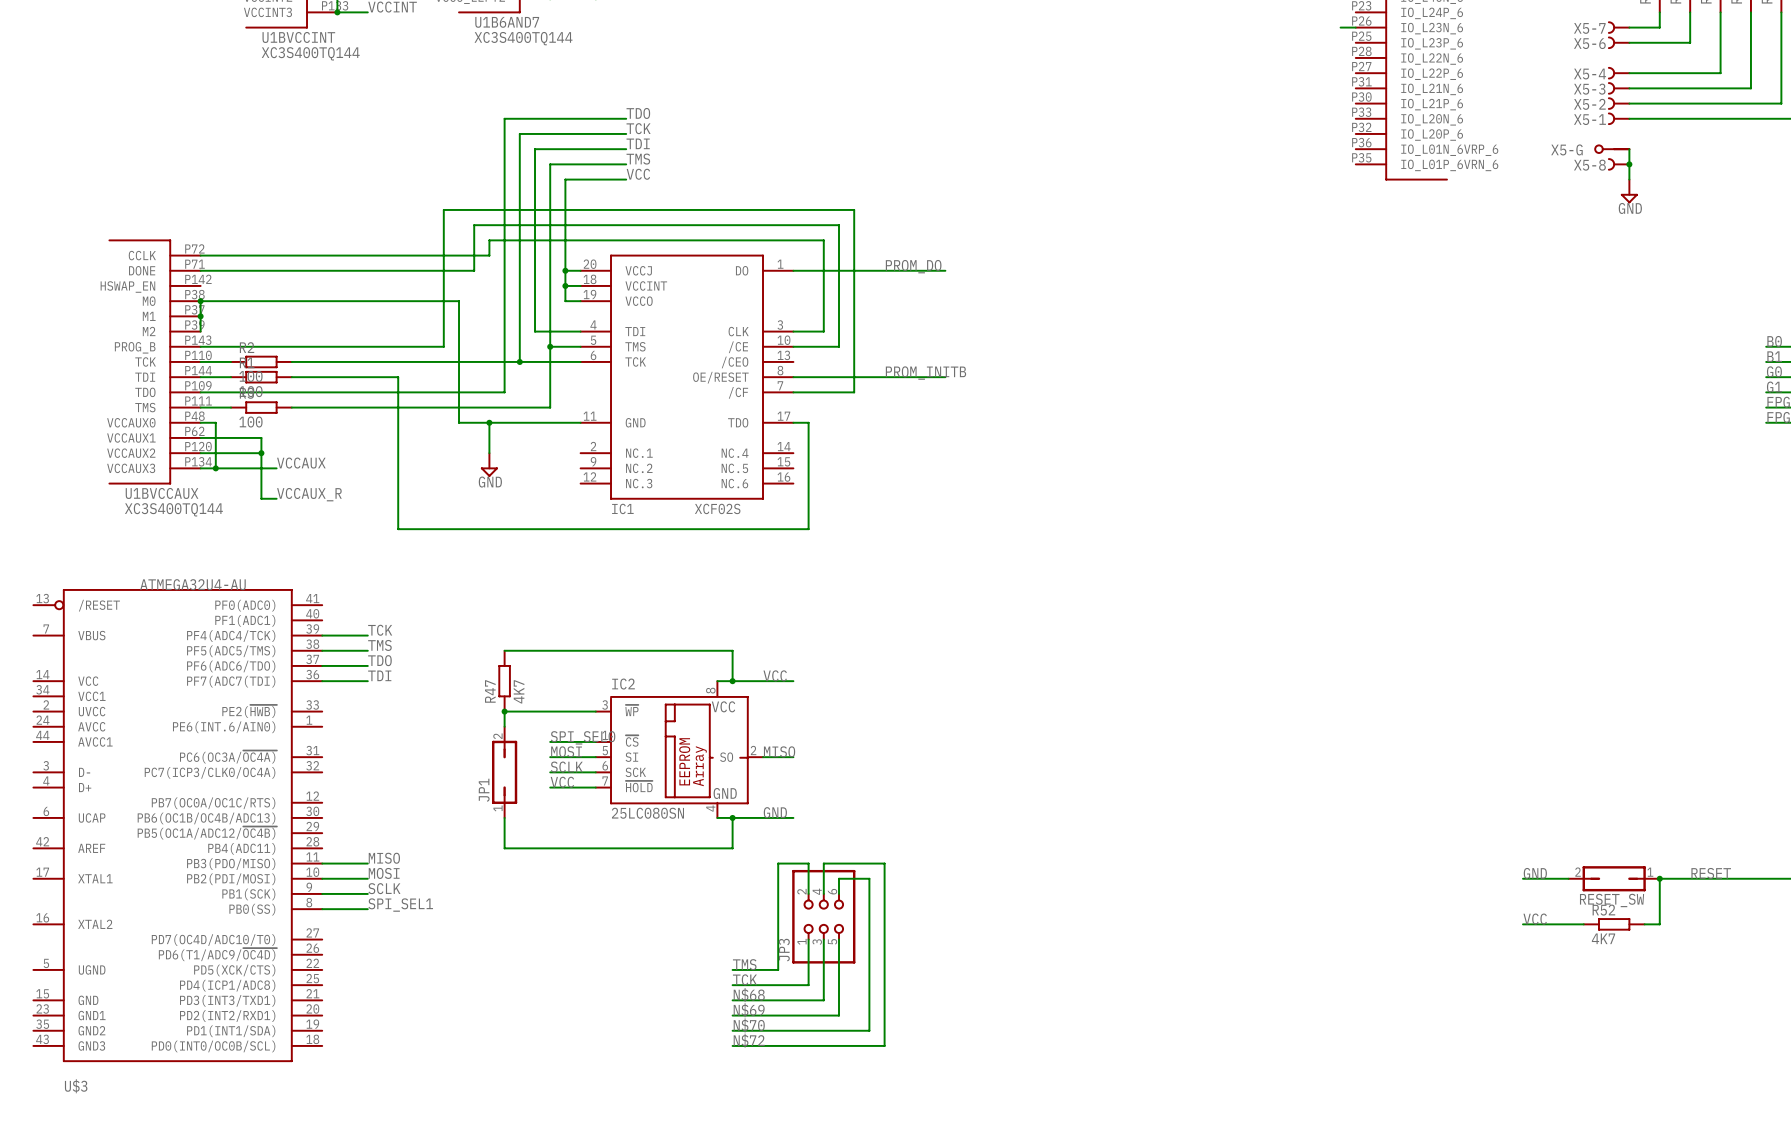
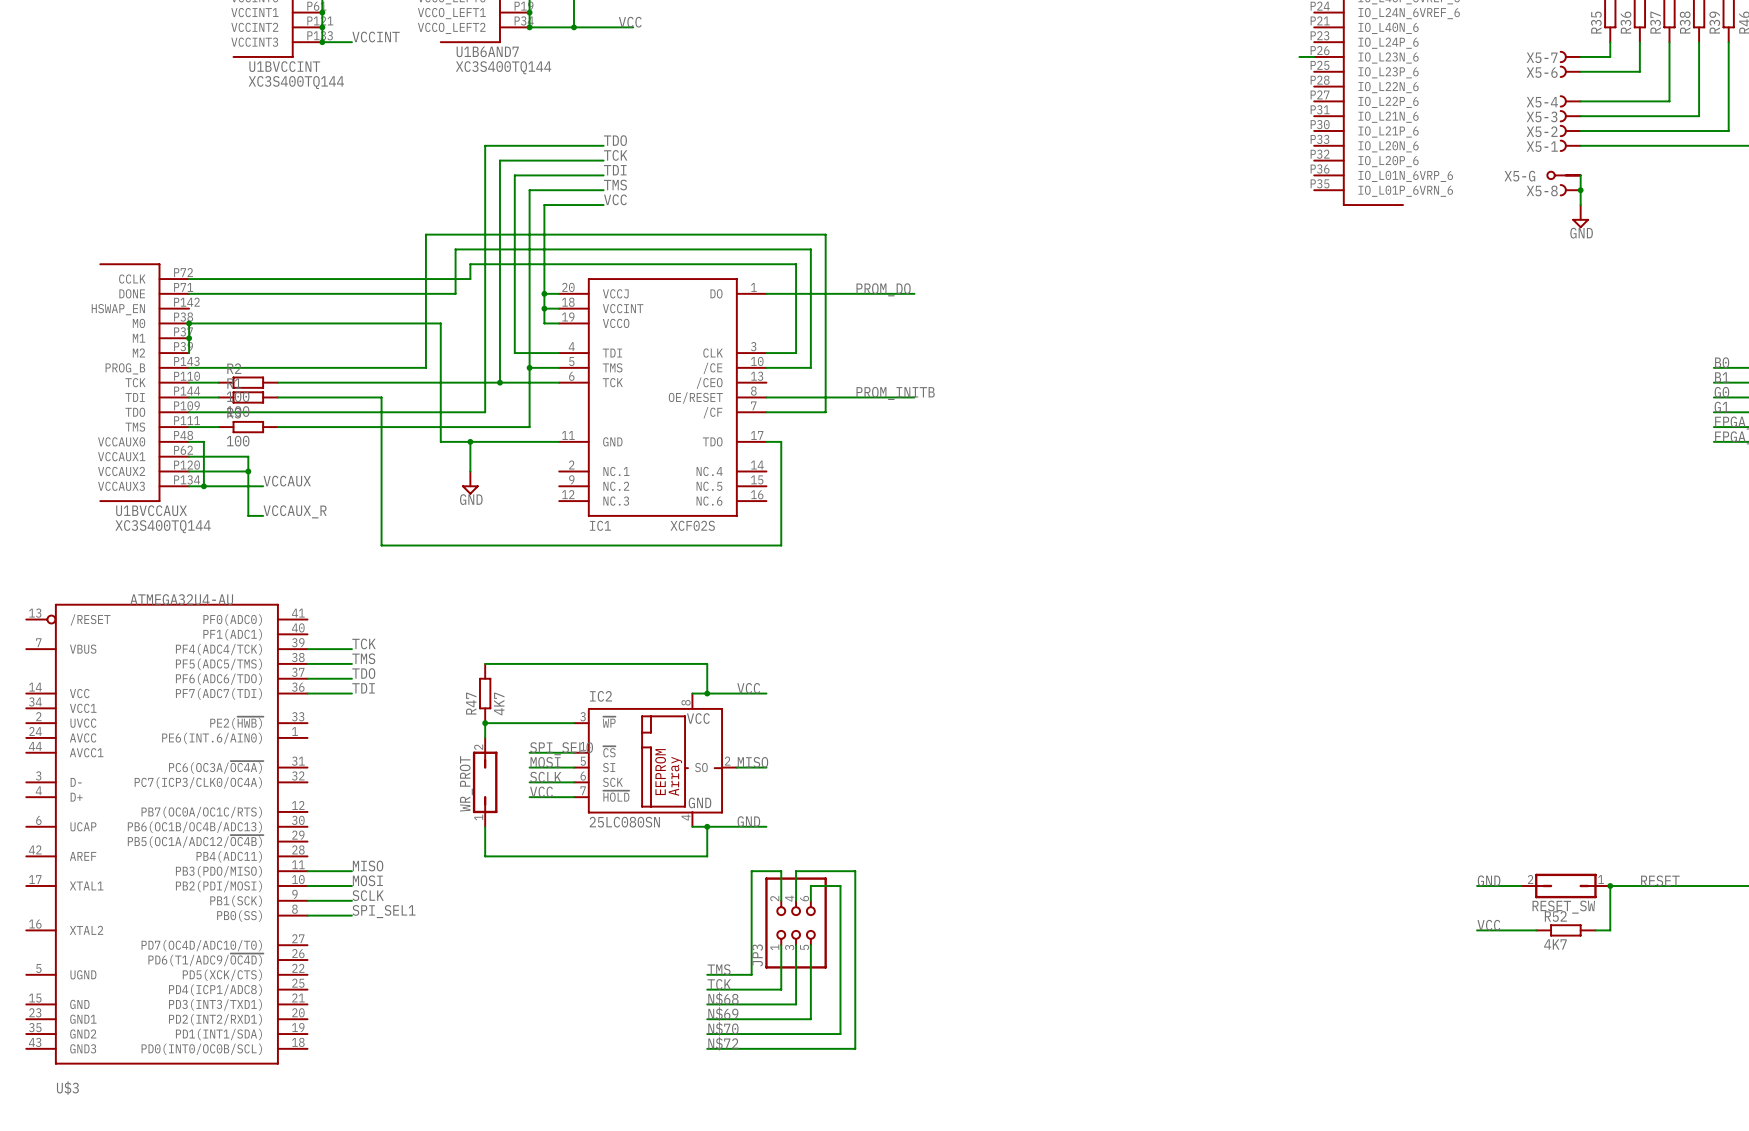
JP1 name: JP1 (484, 790) -> WR_PROT (466, 783)

